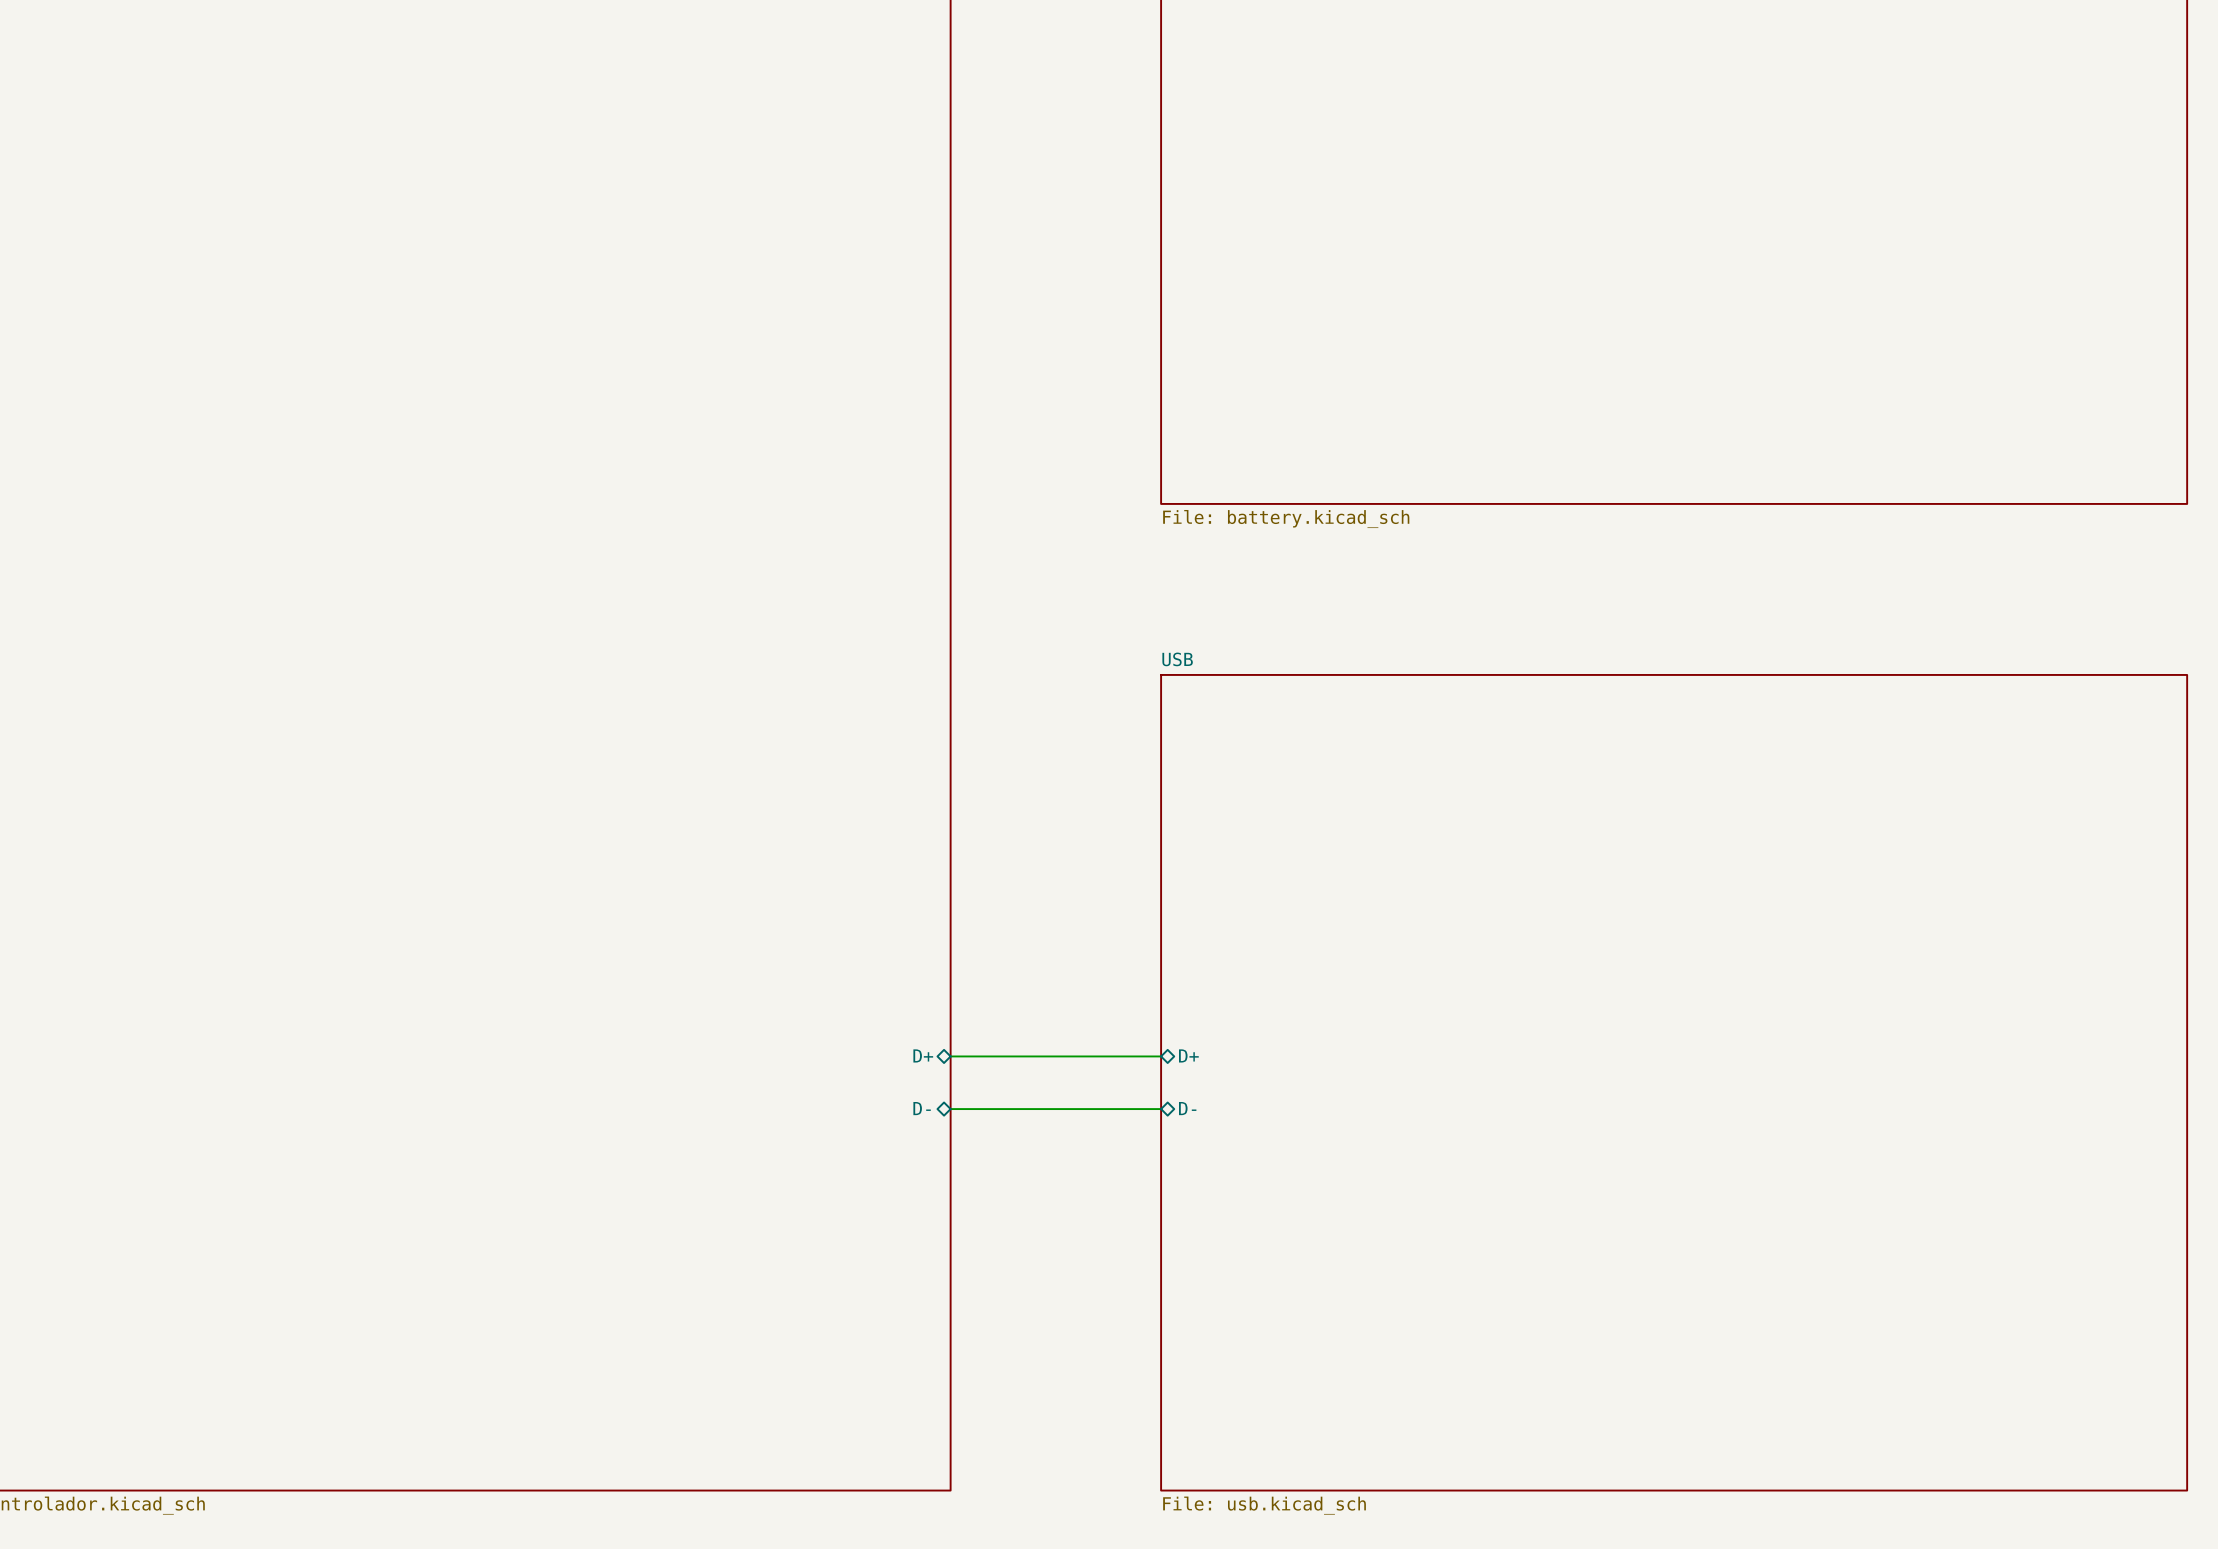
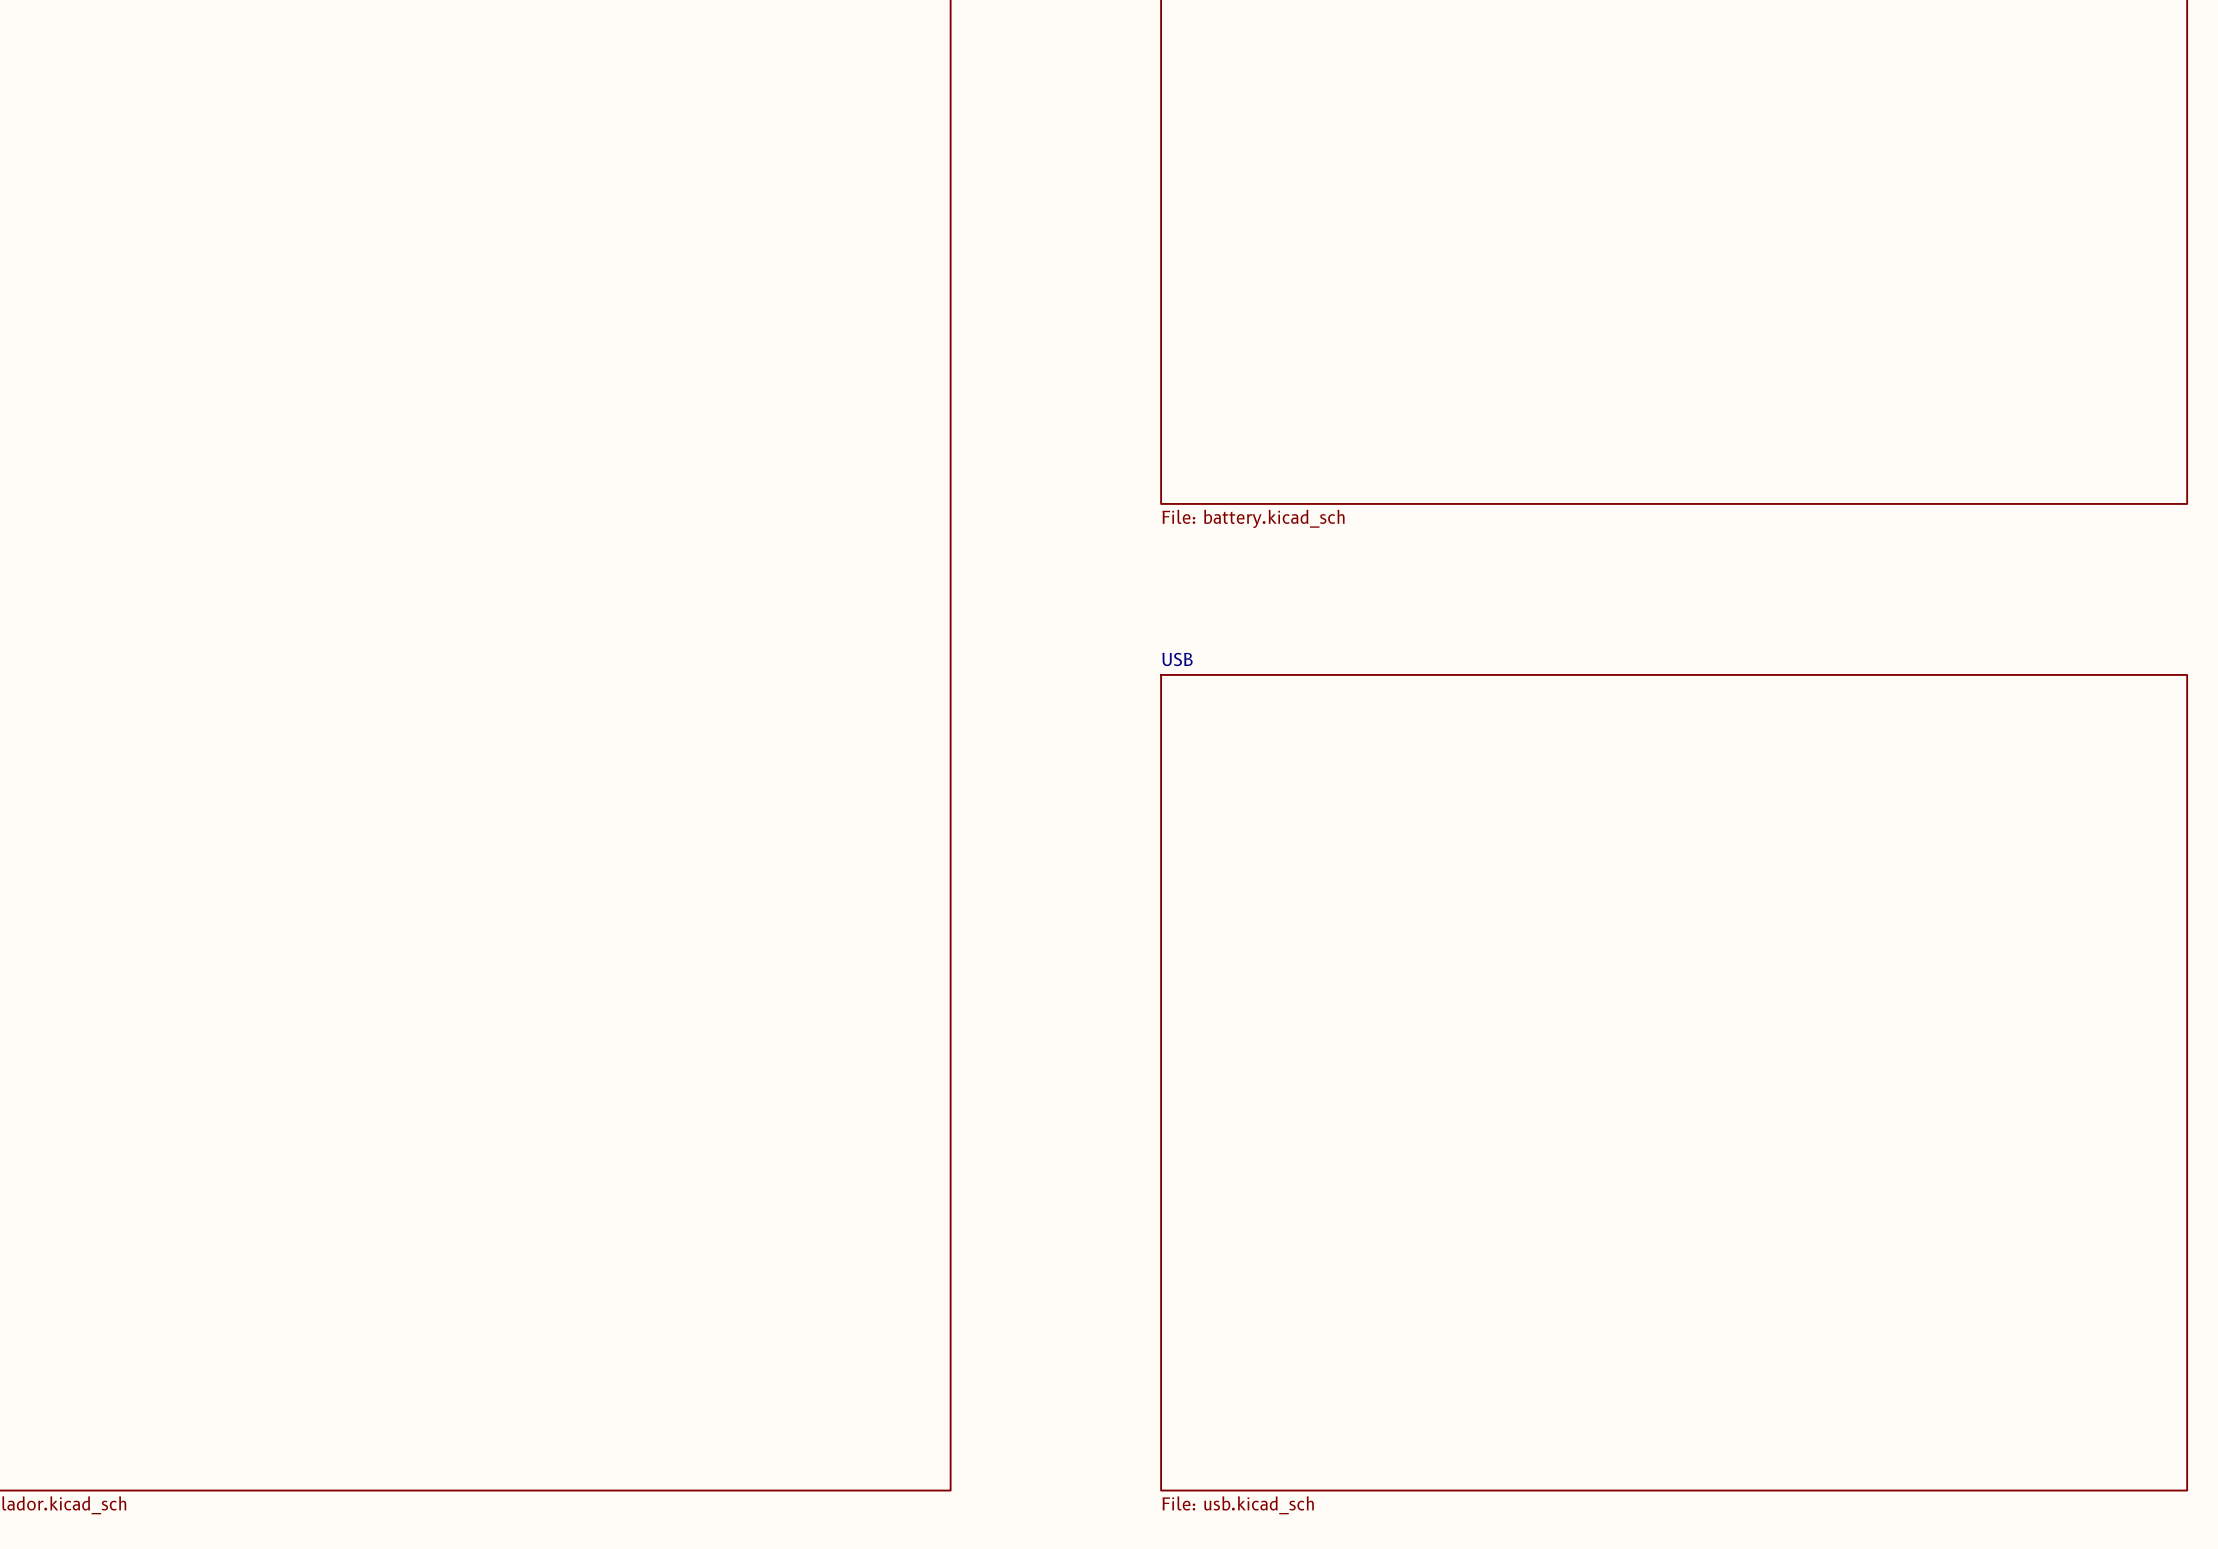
sheet pin: D+ (923, 1055) -> none
sheet pin: D+ (1188, 1055) -> none
wire: (950, 1056) (1161, 1056) -> none
sheet pin: D- (922, 1108) -> none
sheet pin: D- (1187, 1108) -> none
wire: (950, 1109) (1161, 1109) -> none

